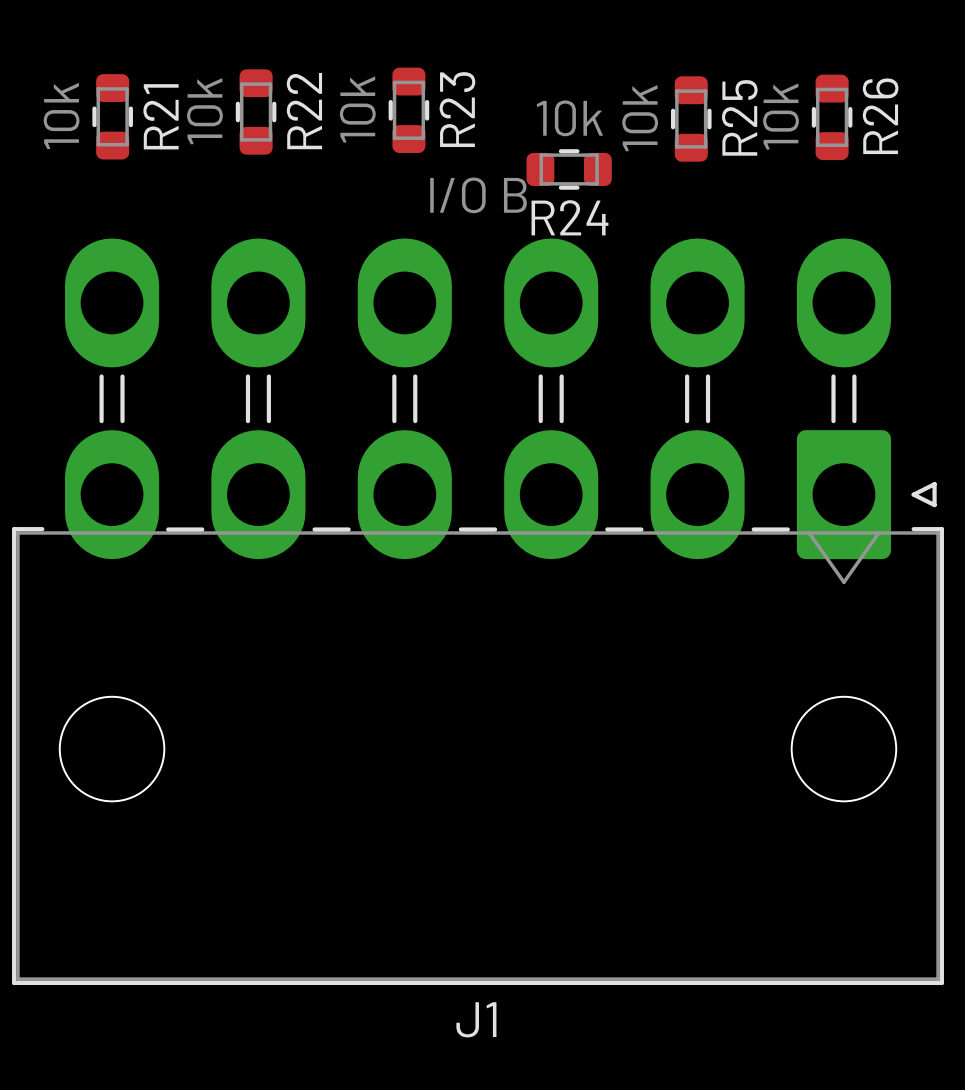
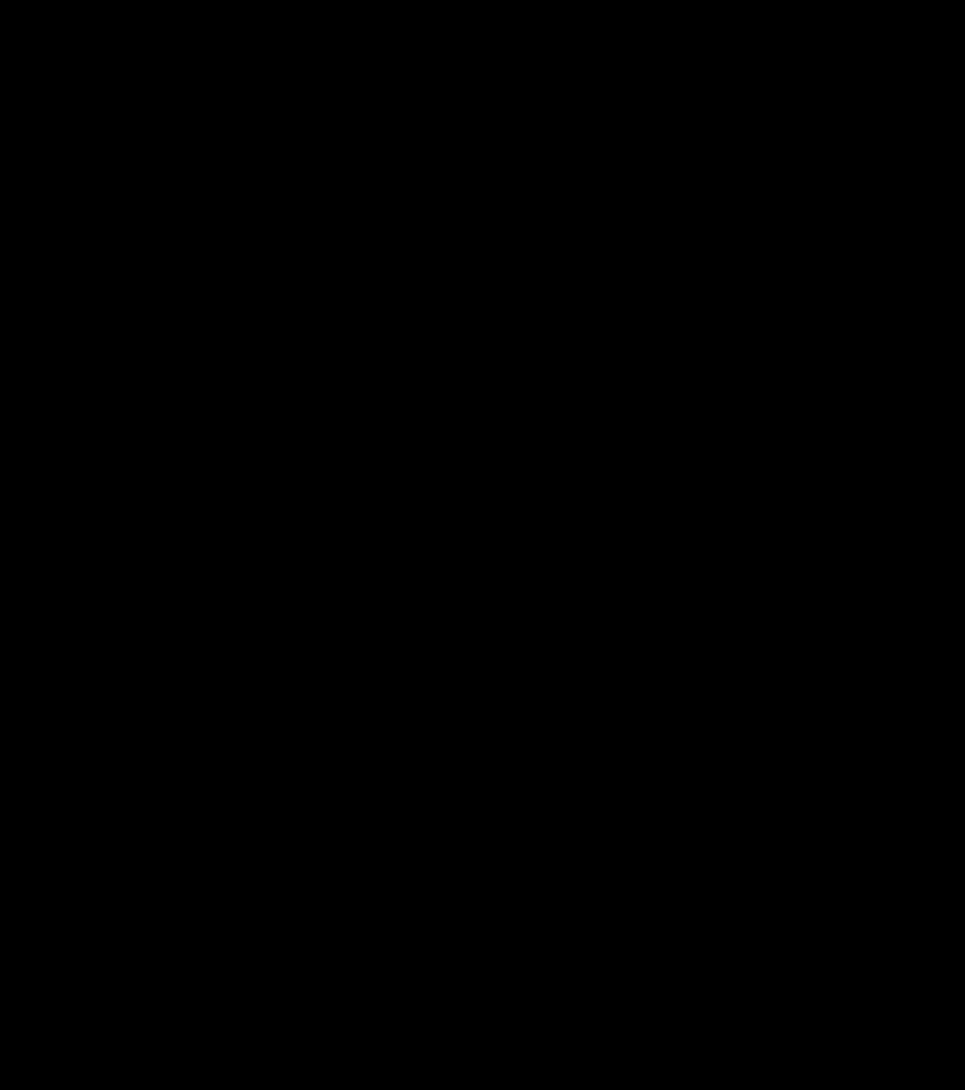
R23: 10k (408, 110) -> none
R22: 10k (256, 111) -> none
R21: 10k (112, 116) -> none
R26: 10k (832, 117) -> none
R25: 10k (691, 119) -> none
R24: 10k (569, 169) -> none
J1: I/O B (478, 611) -> none

